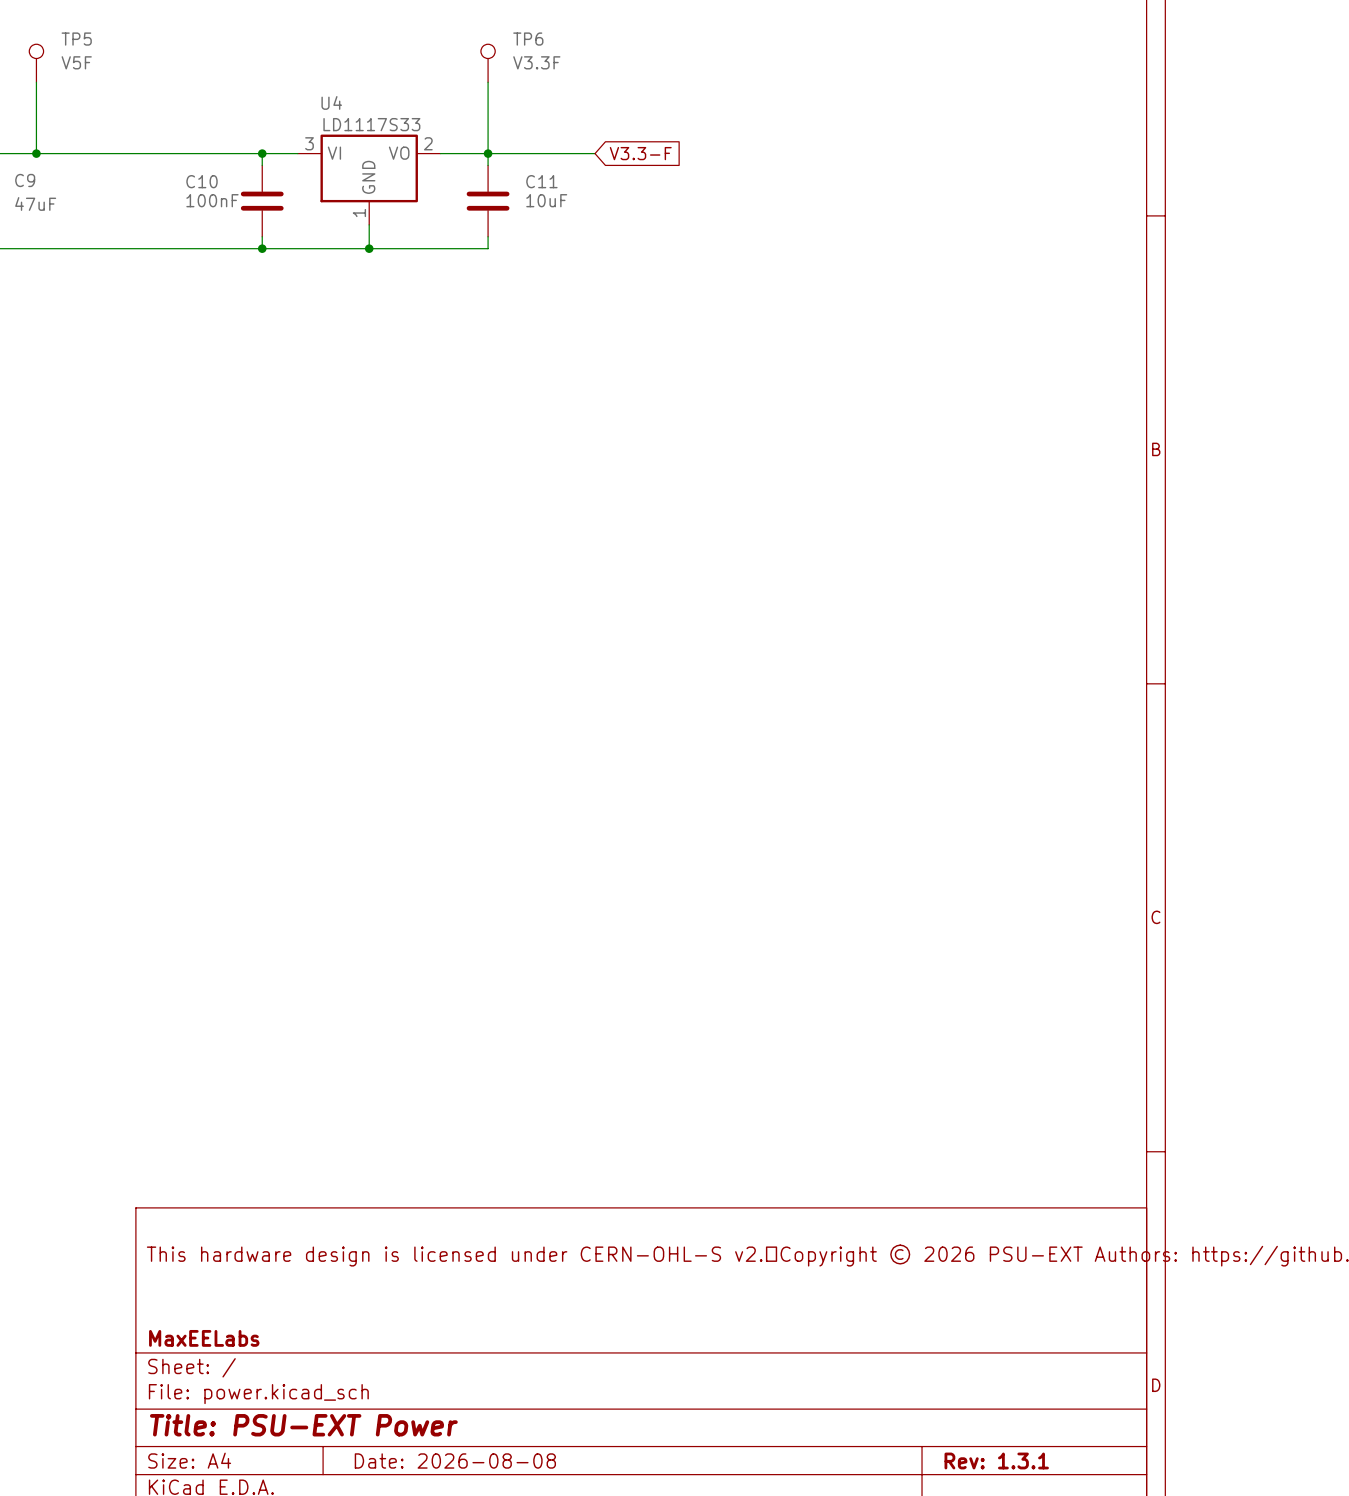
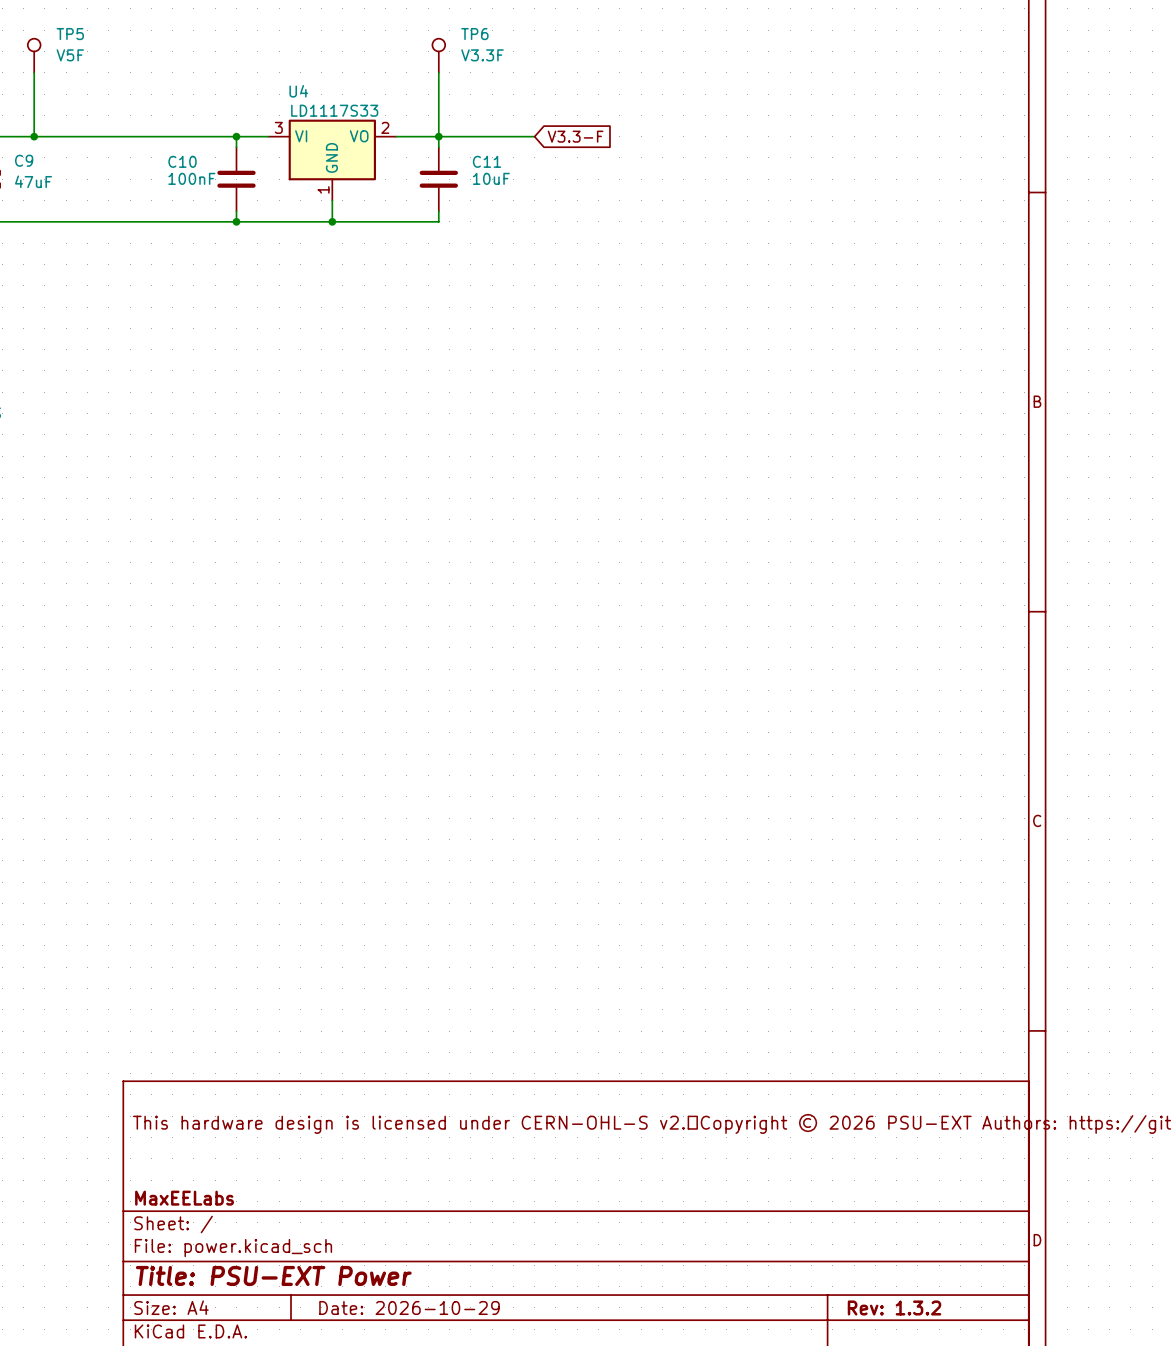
title block: Date: 2026-08-08 (455, 1460) -> Date: 2026-10-29 (409, 1307)
title block: Rev: 1.3.1 (996, 1460) -> Rev: 1.3.2 (894, 1307)

